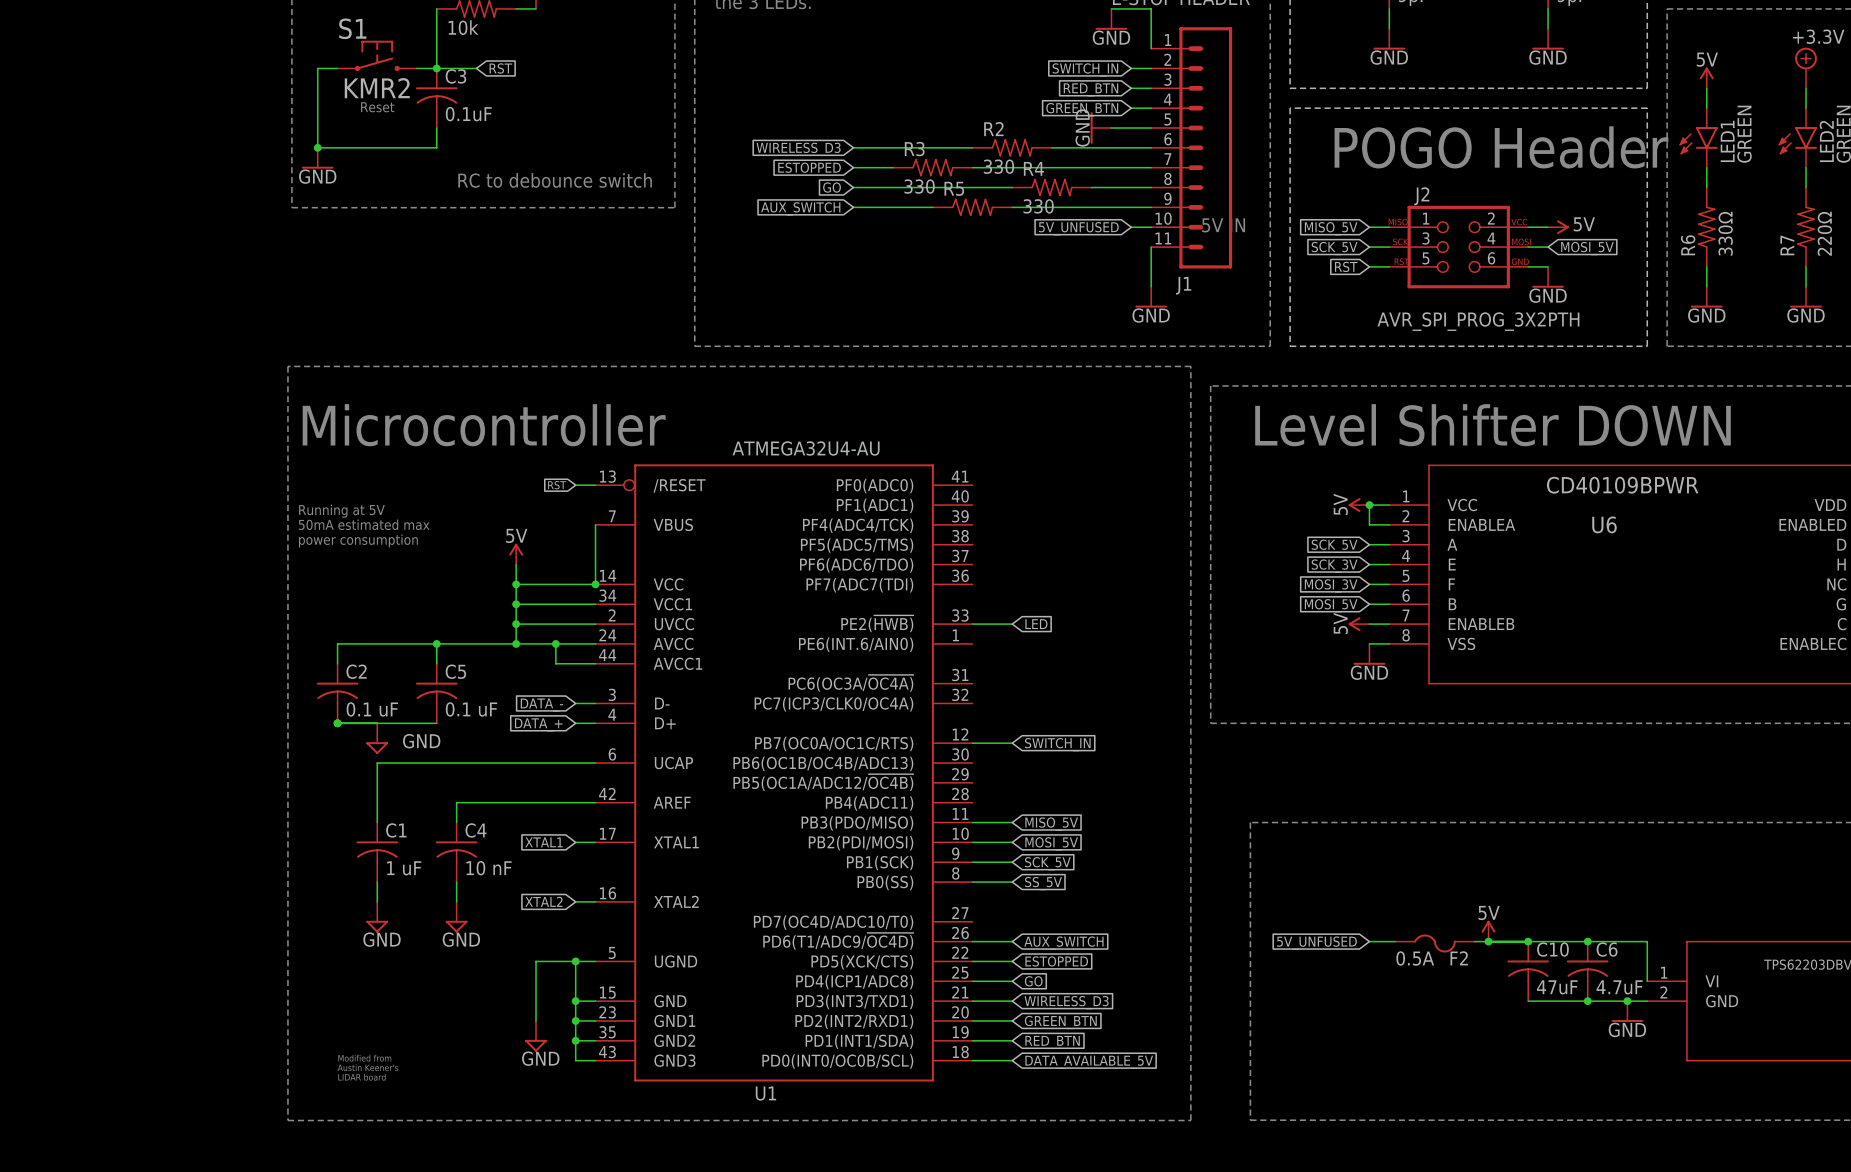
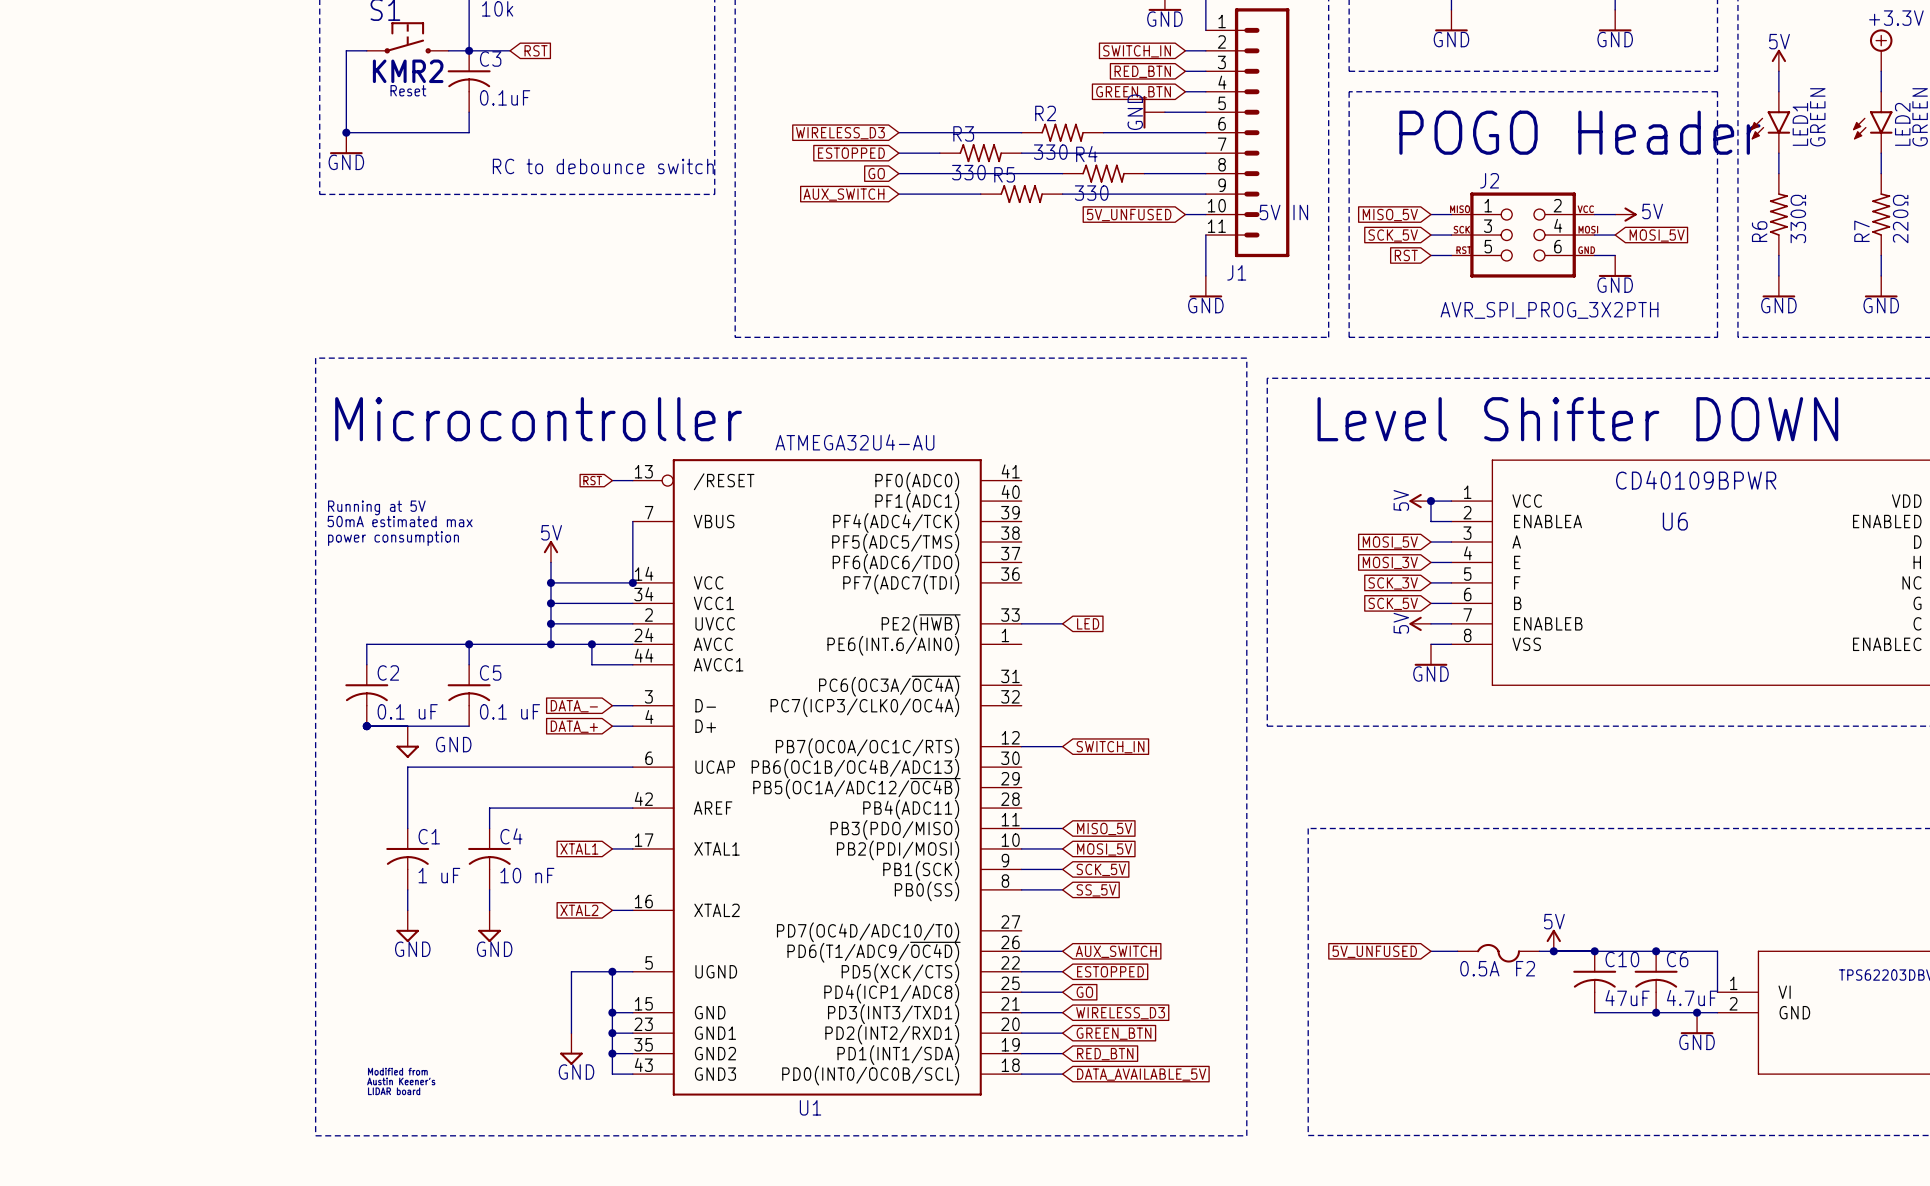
global label: SCK_5V (1334, 546) -> MOSI_5V (1390, 542)
global label: SCK_3V (1334, 566) -> MOSI_3V (1390, 562)
global label: MOSI_3V (1331, 585) -> SCK_3V (1393, 583)
global label: MOSI_5V (1331, 605) -> SCK_5V (1393, 603)

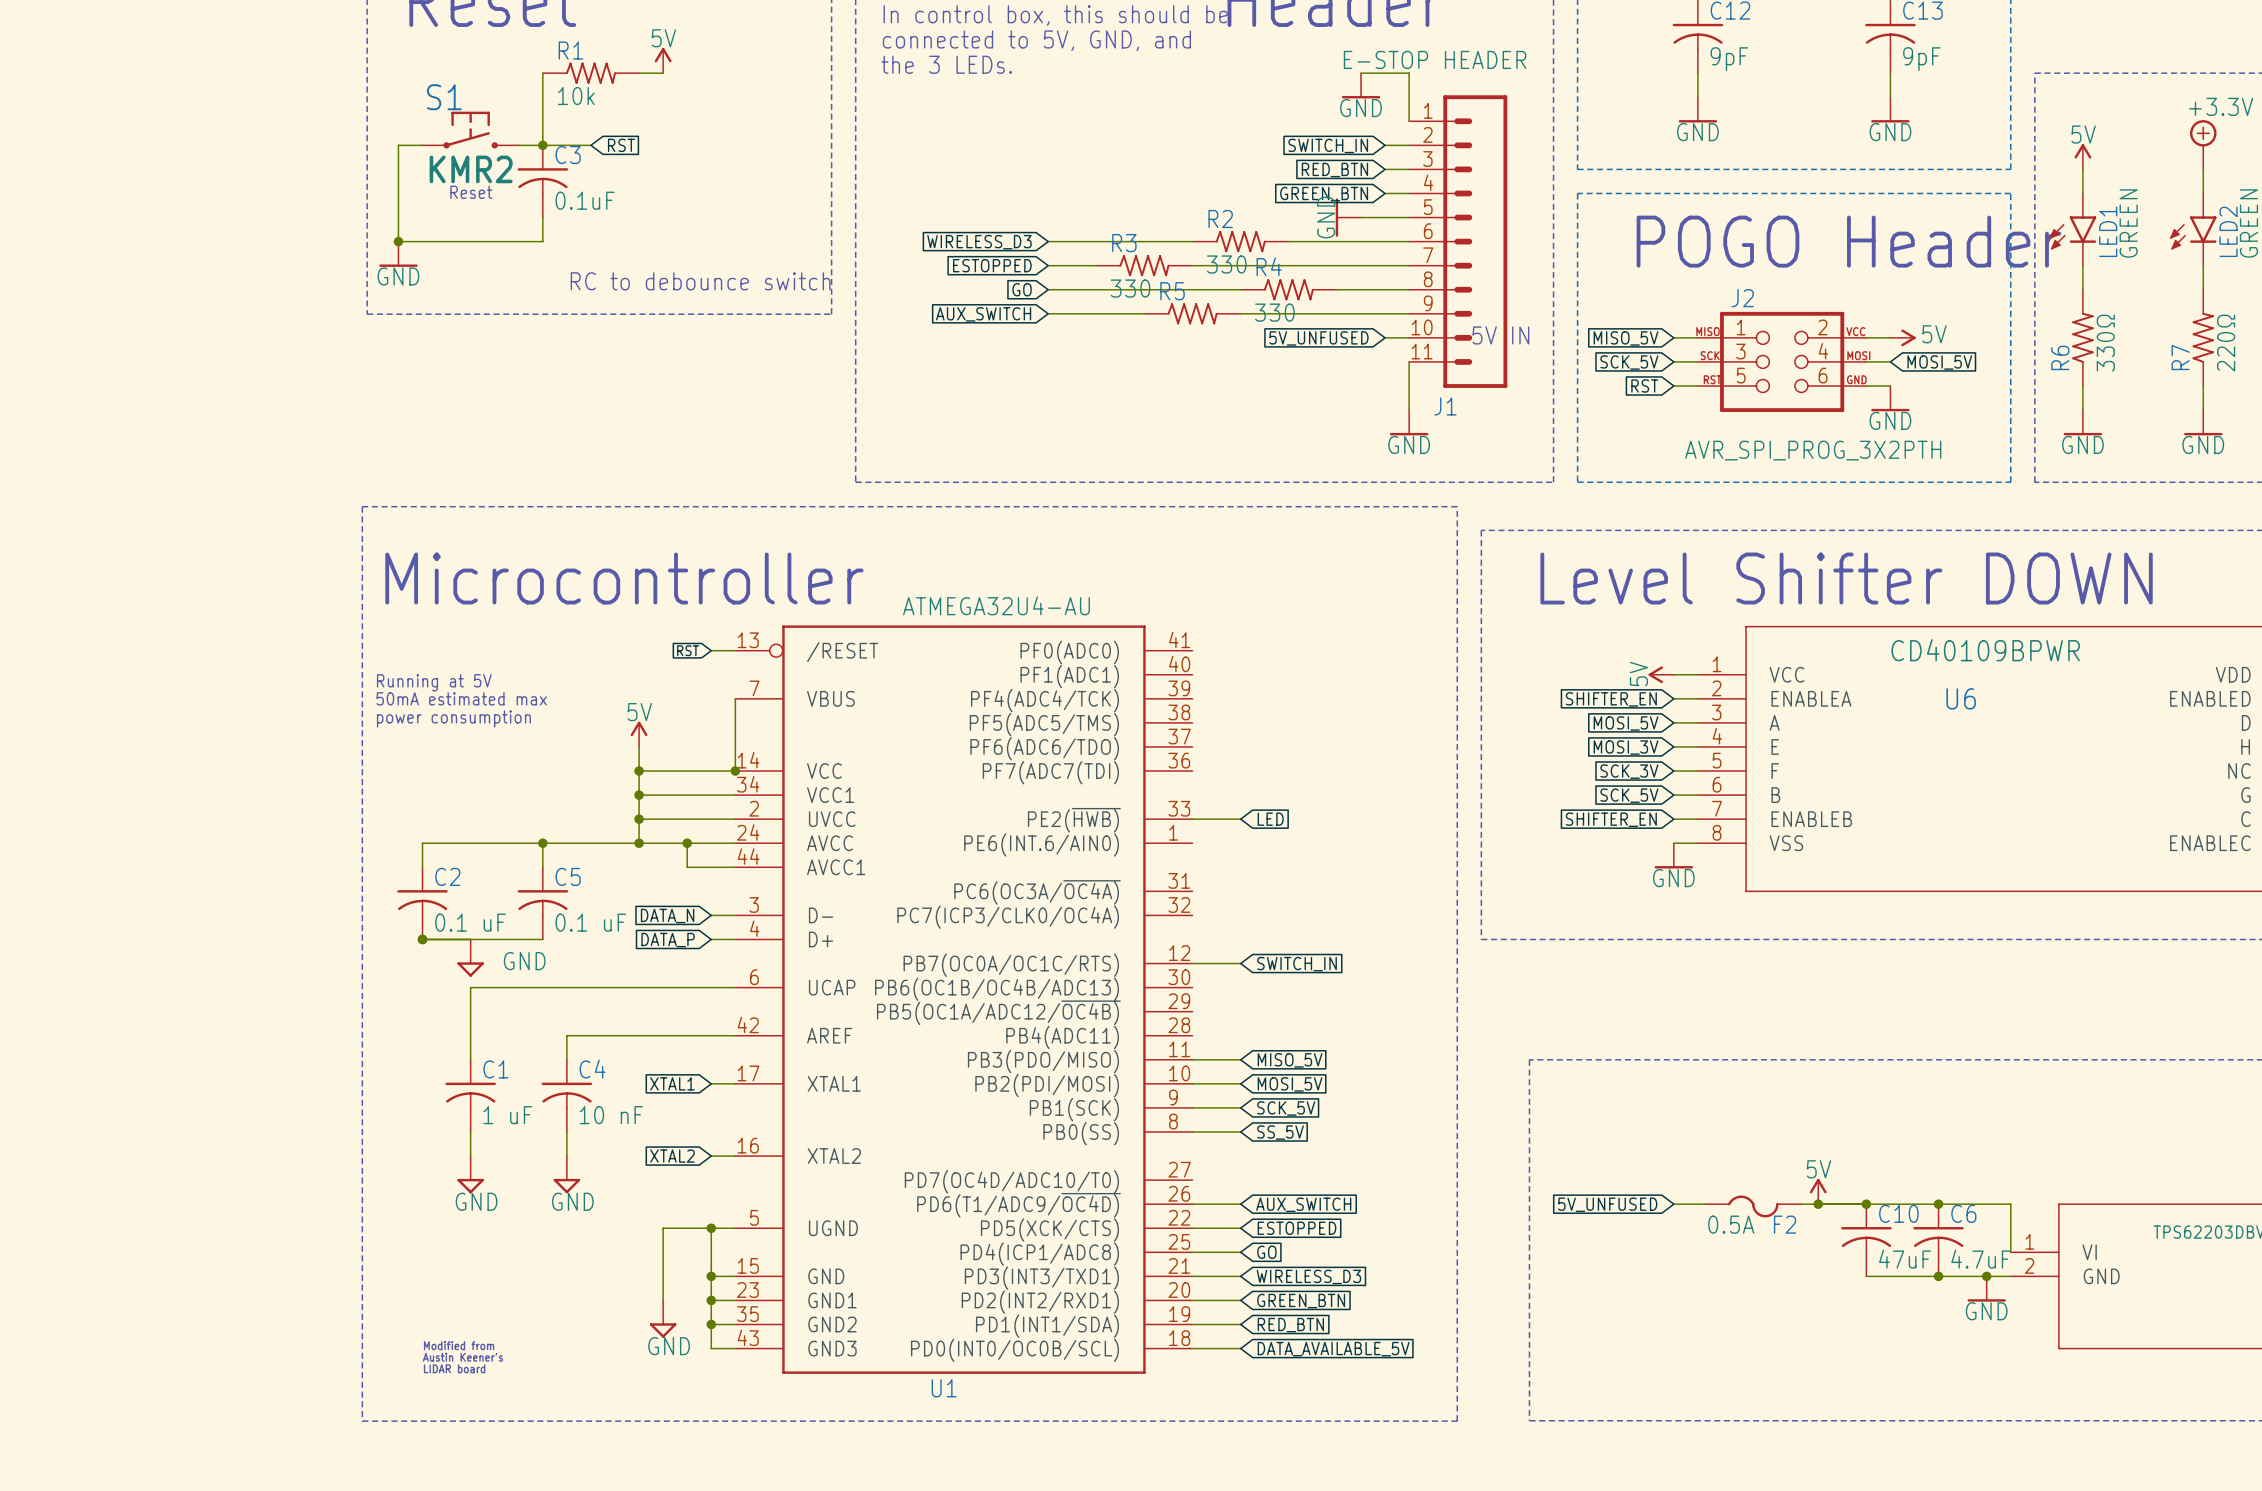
wire: (1430, 501) (1430, 521) -> none
junction: (1430, 501) -> none
global label: none -> SHIFTER_EN (1611, 699)
power symbol: 5V (1420, 623) -> none
global label: none -> SHIFTER_EN (1611, 819)
global label: DATA_- (574, 706) -> DATA_N (667, 915)
global label: DATA_+ (574, 726) -> DATA_P (668, 940)

